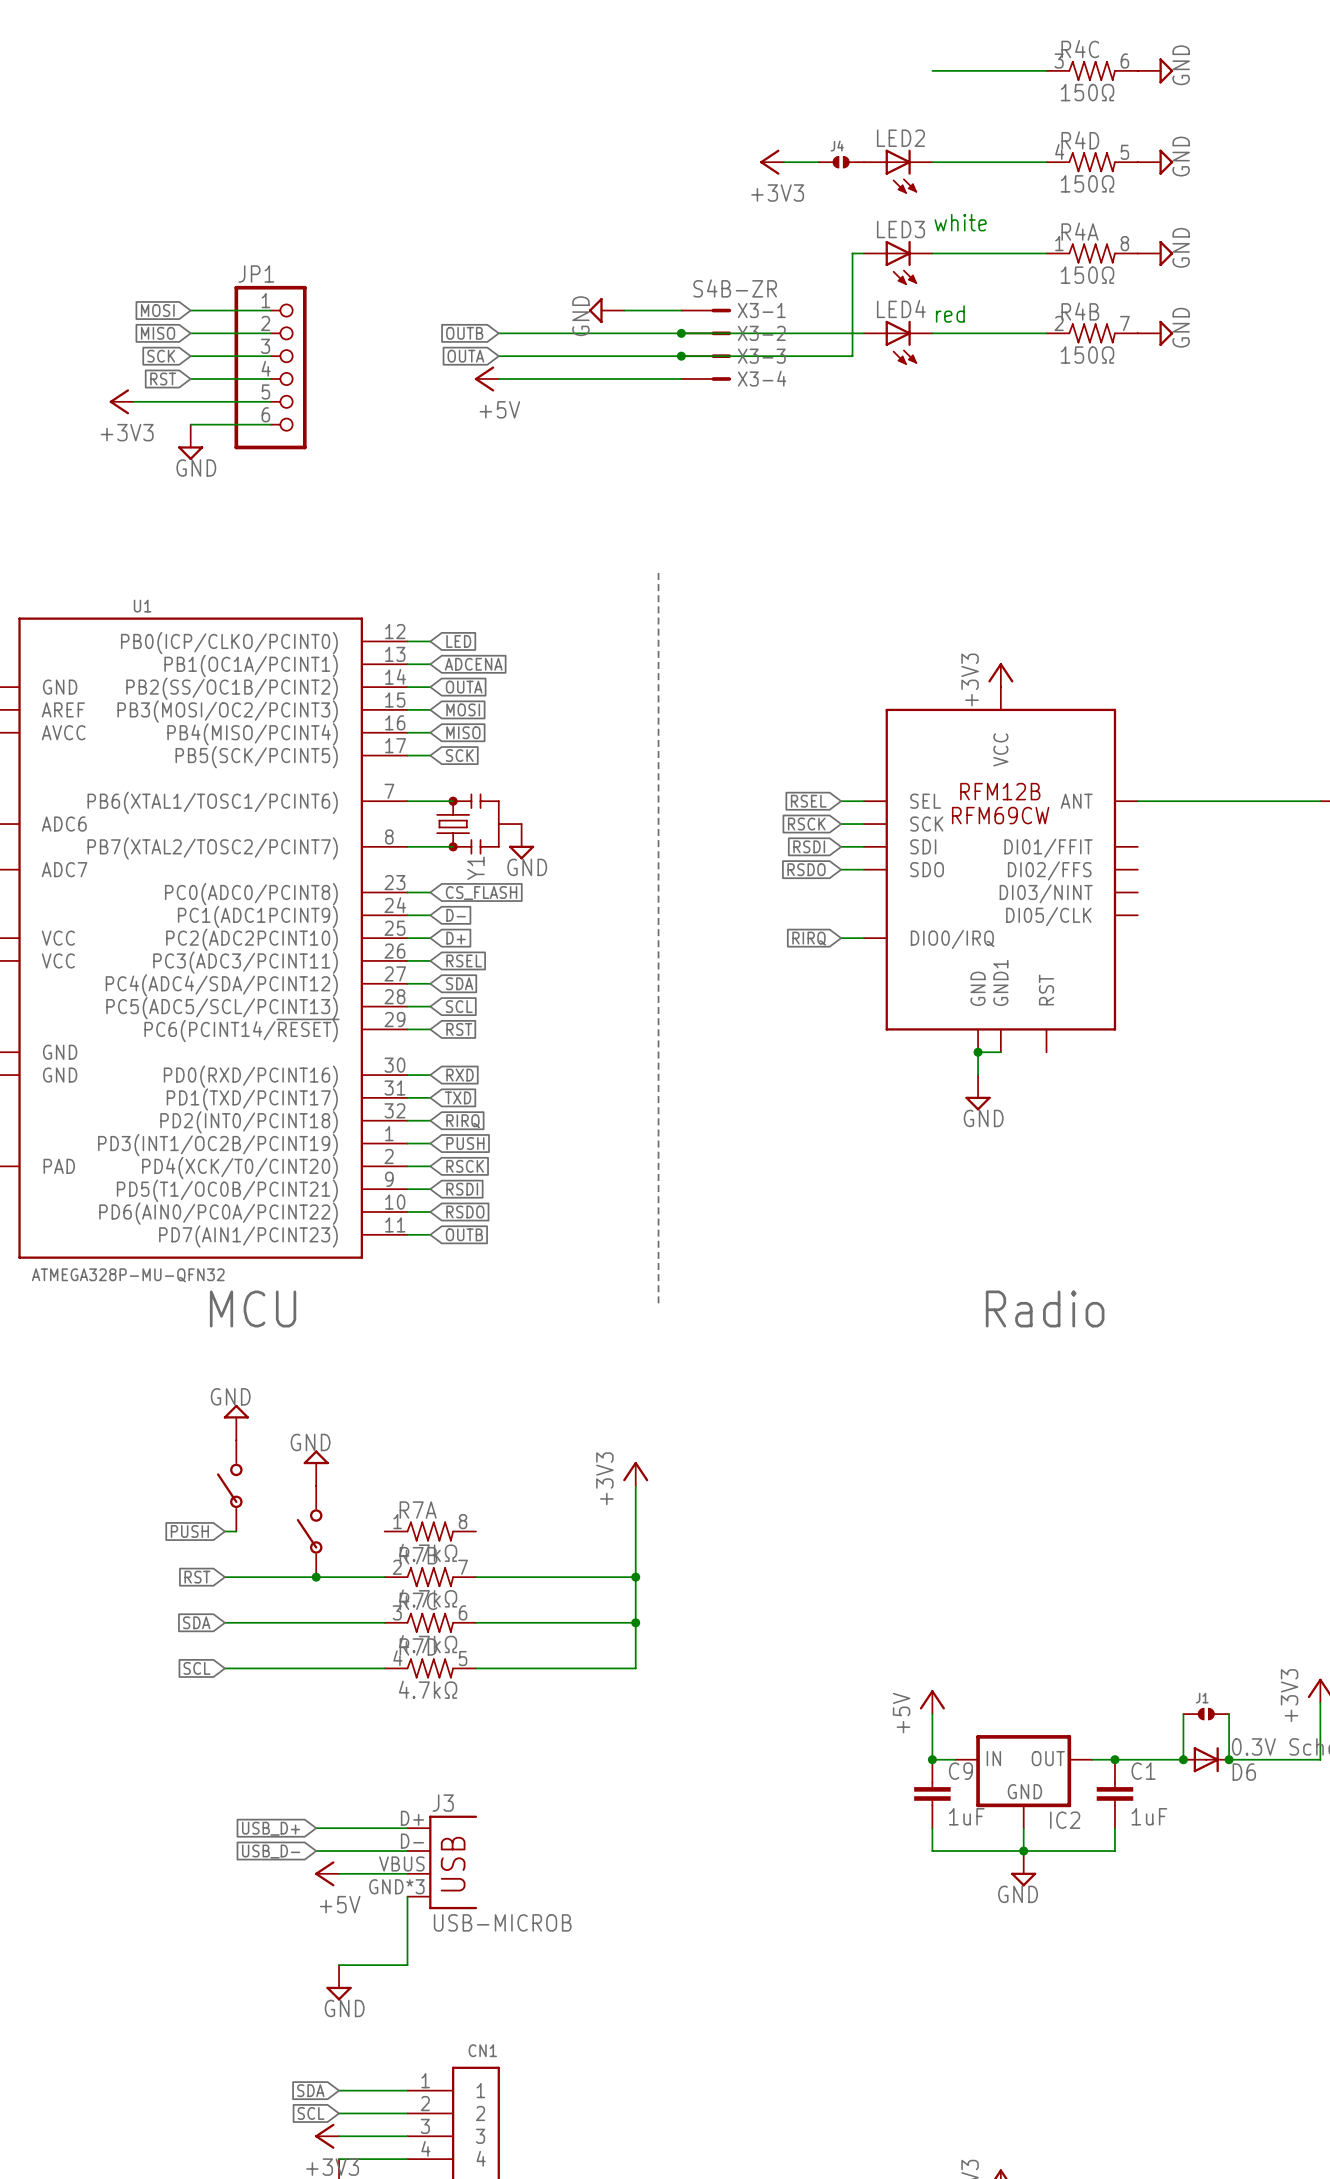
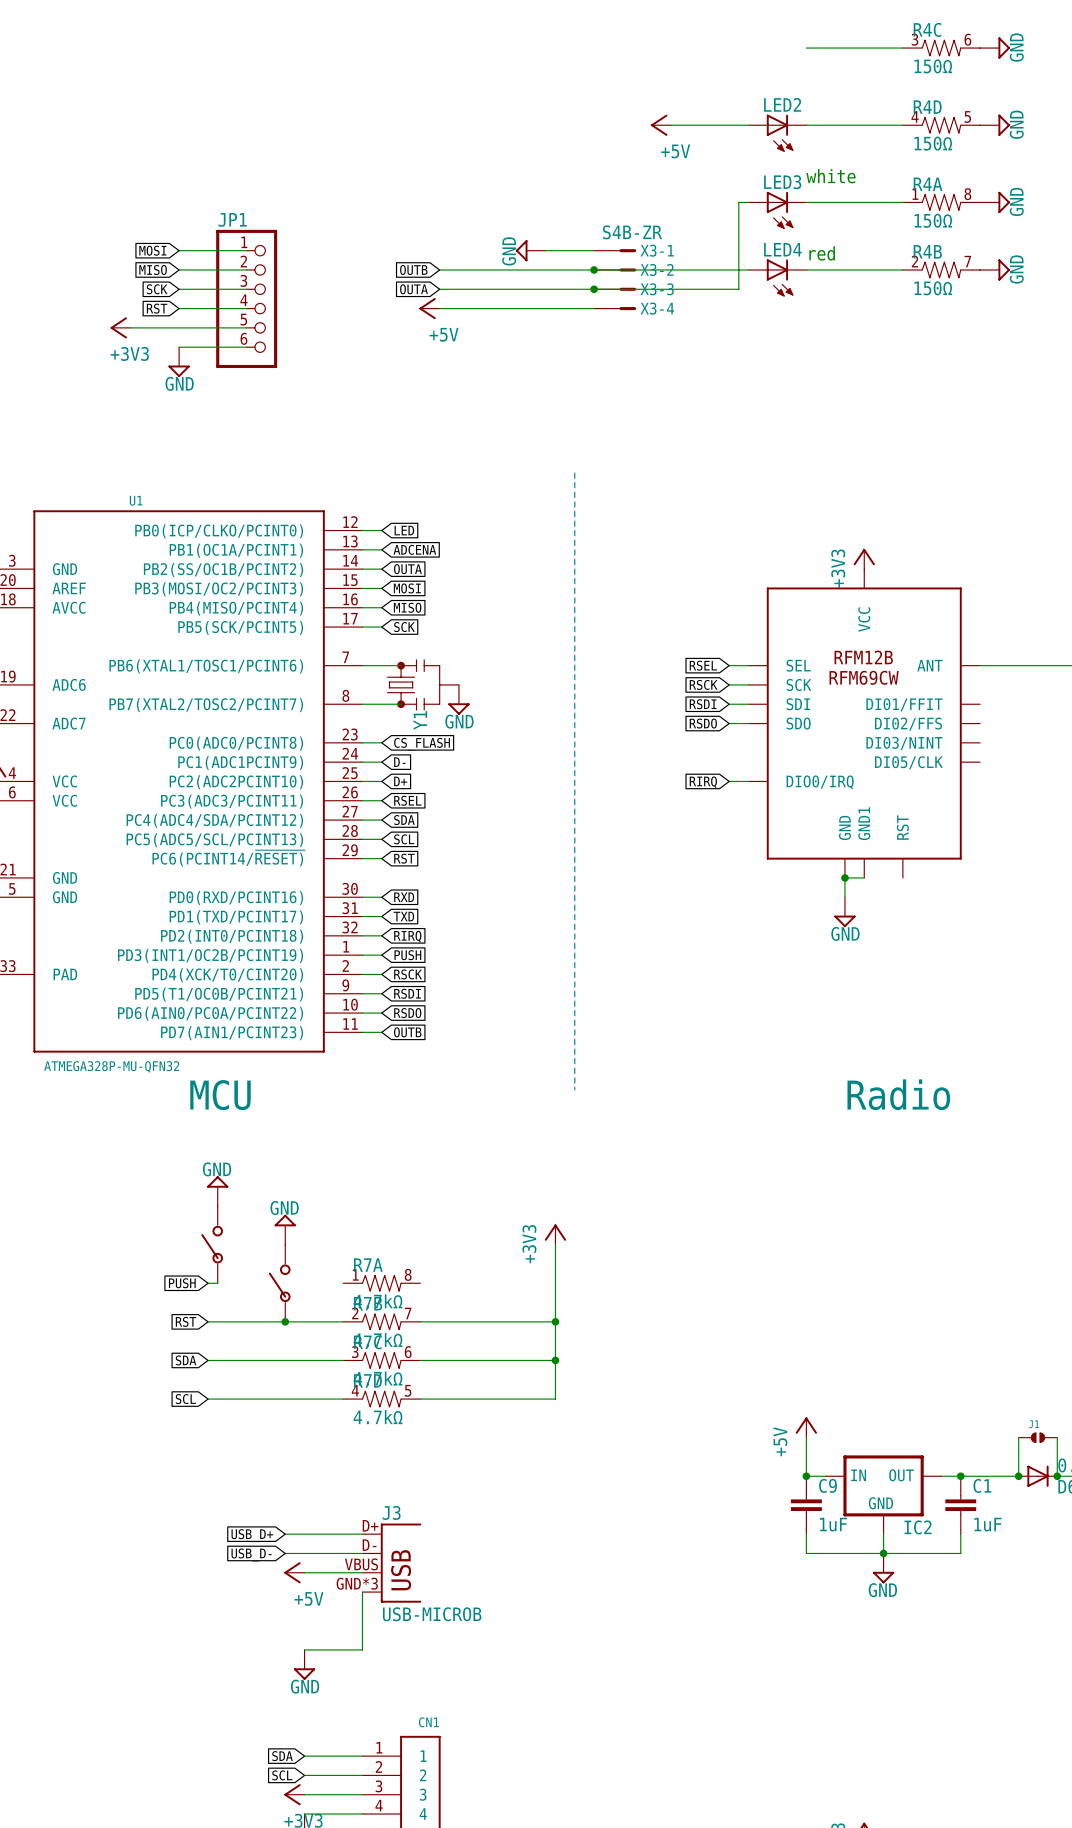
power symbol: none -> +5V (661, 125)
power symbol: +3V3 (772, 162) -> none
J4: (841, 162) -> none

